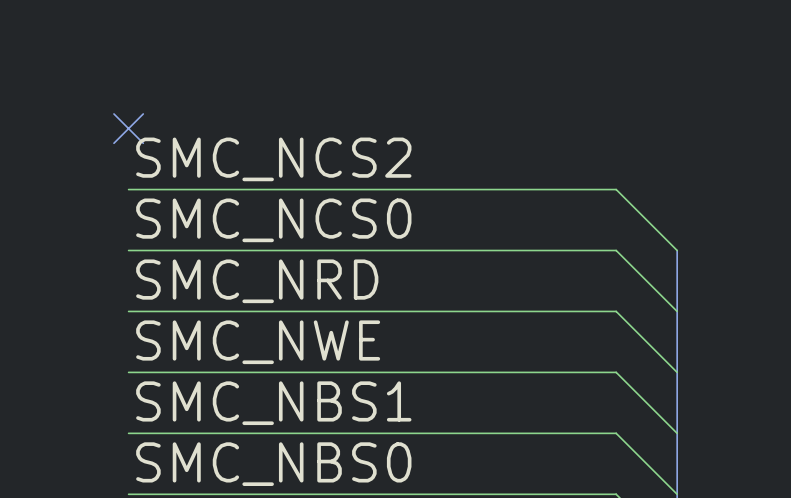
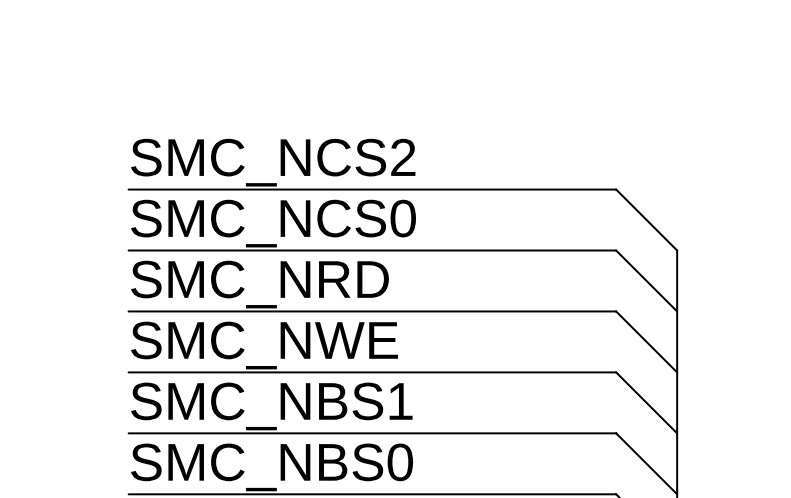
no-connect mark: (128, 128) -> none

